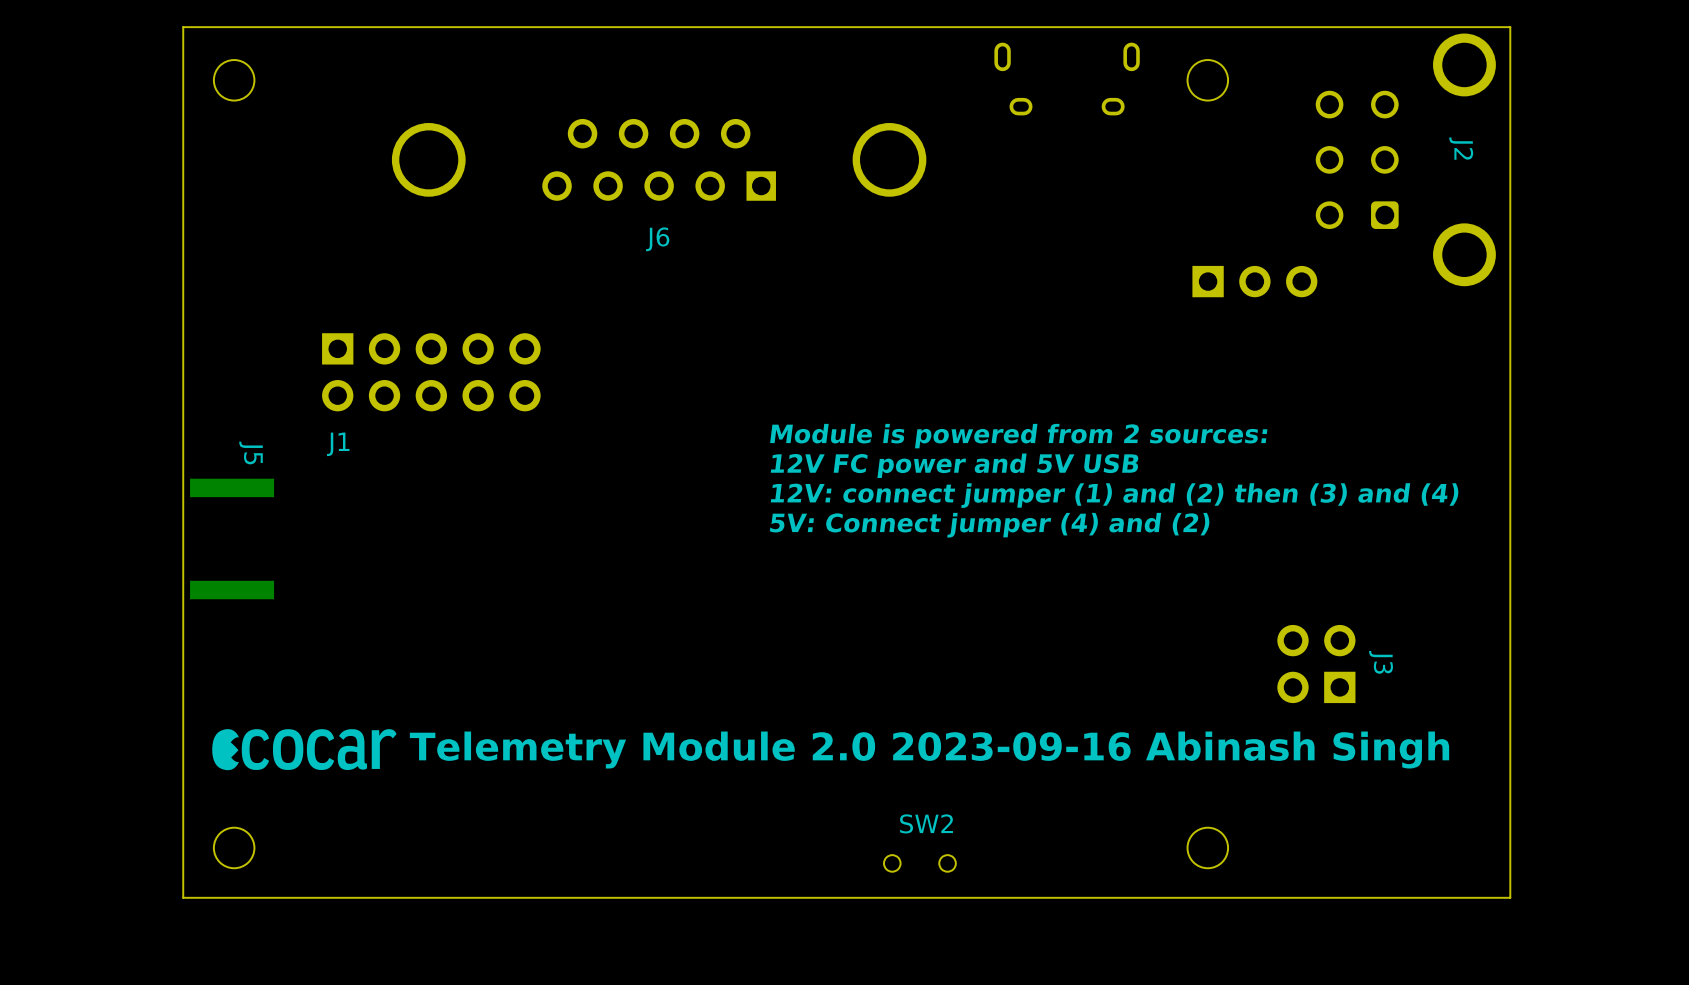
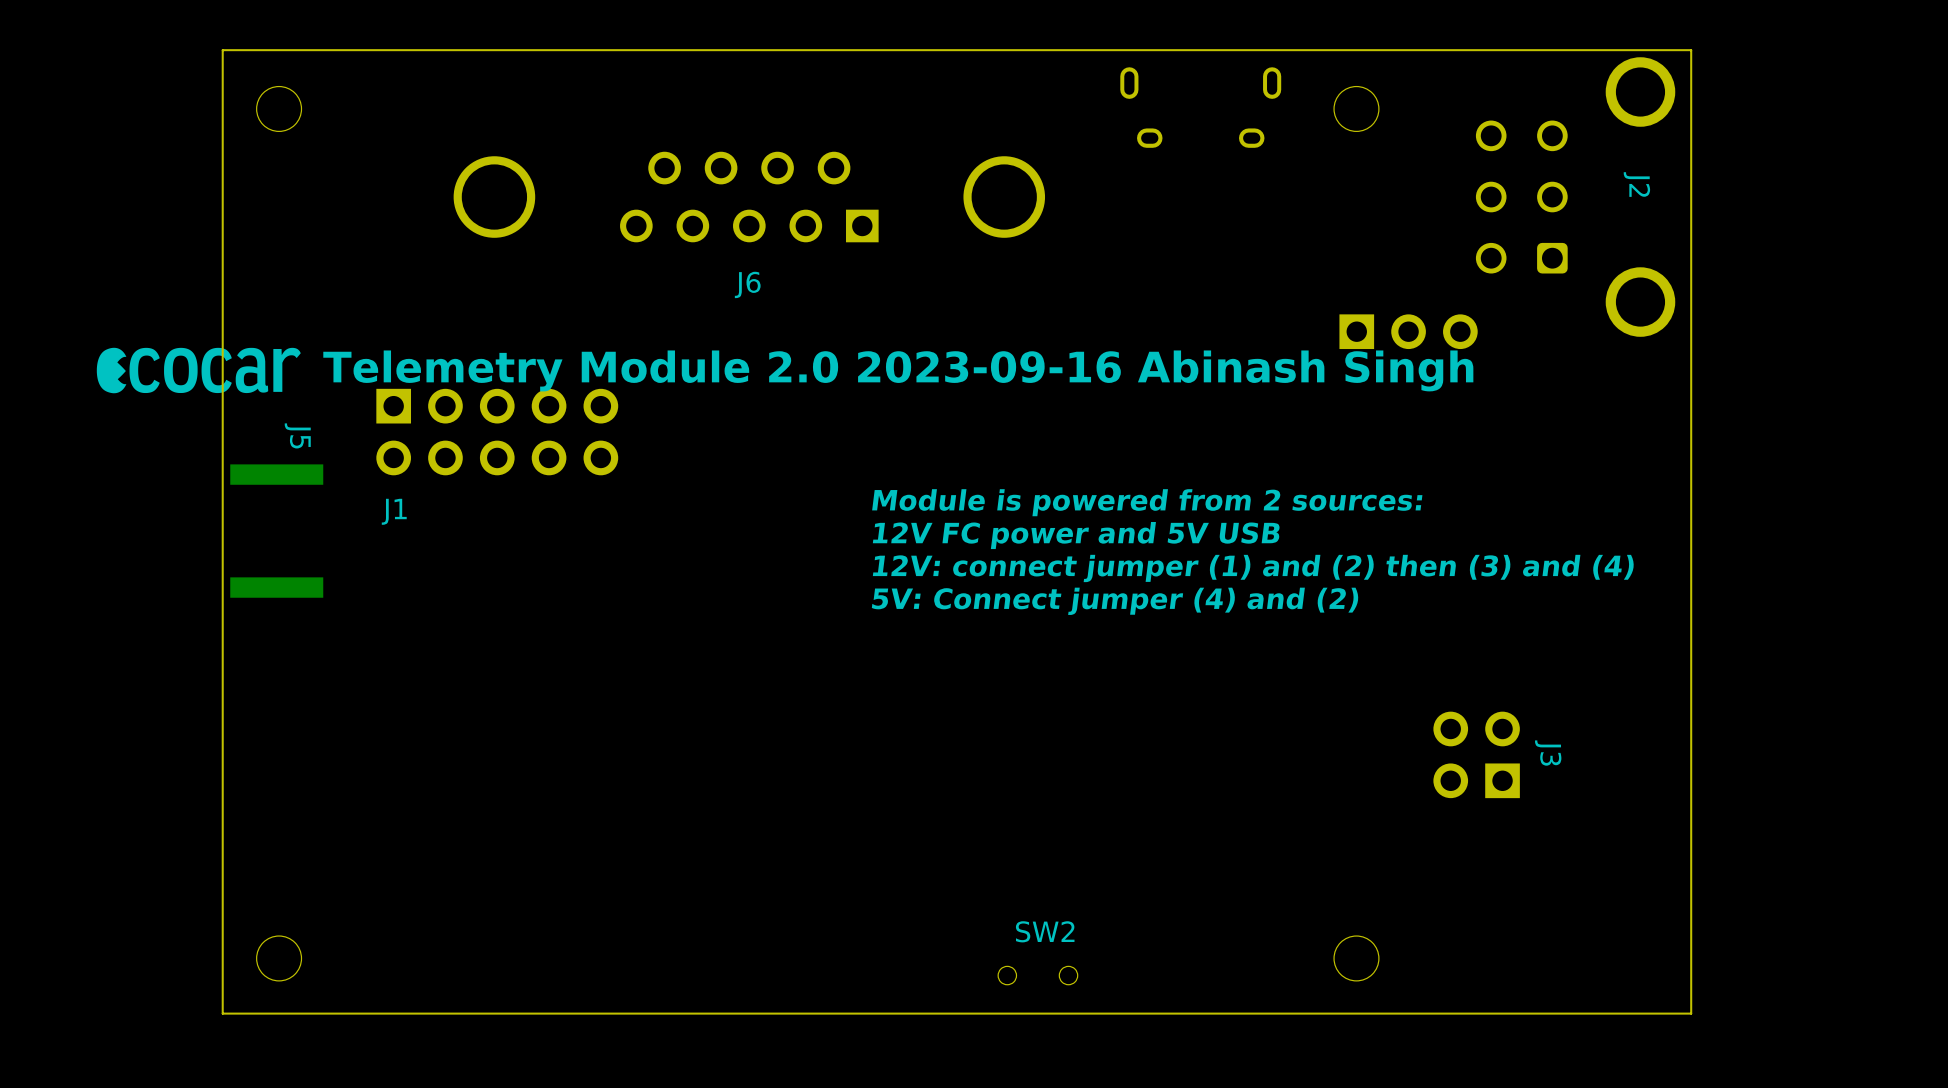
J5 position: (232, 538) -> (276, 531)
drawing position: (304, 749) -> (198, 370)
text position: Telemetry Module 2.0 2023-09-16 Abinash Singh (929, 750) -> Telemetry Module 2.0 2023-09-16 Abinash Singh (898, 370)

